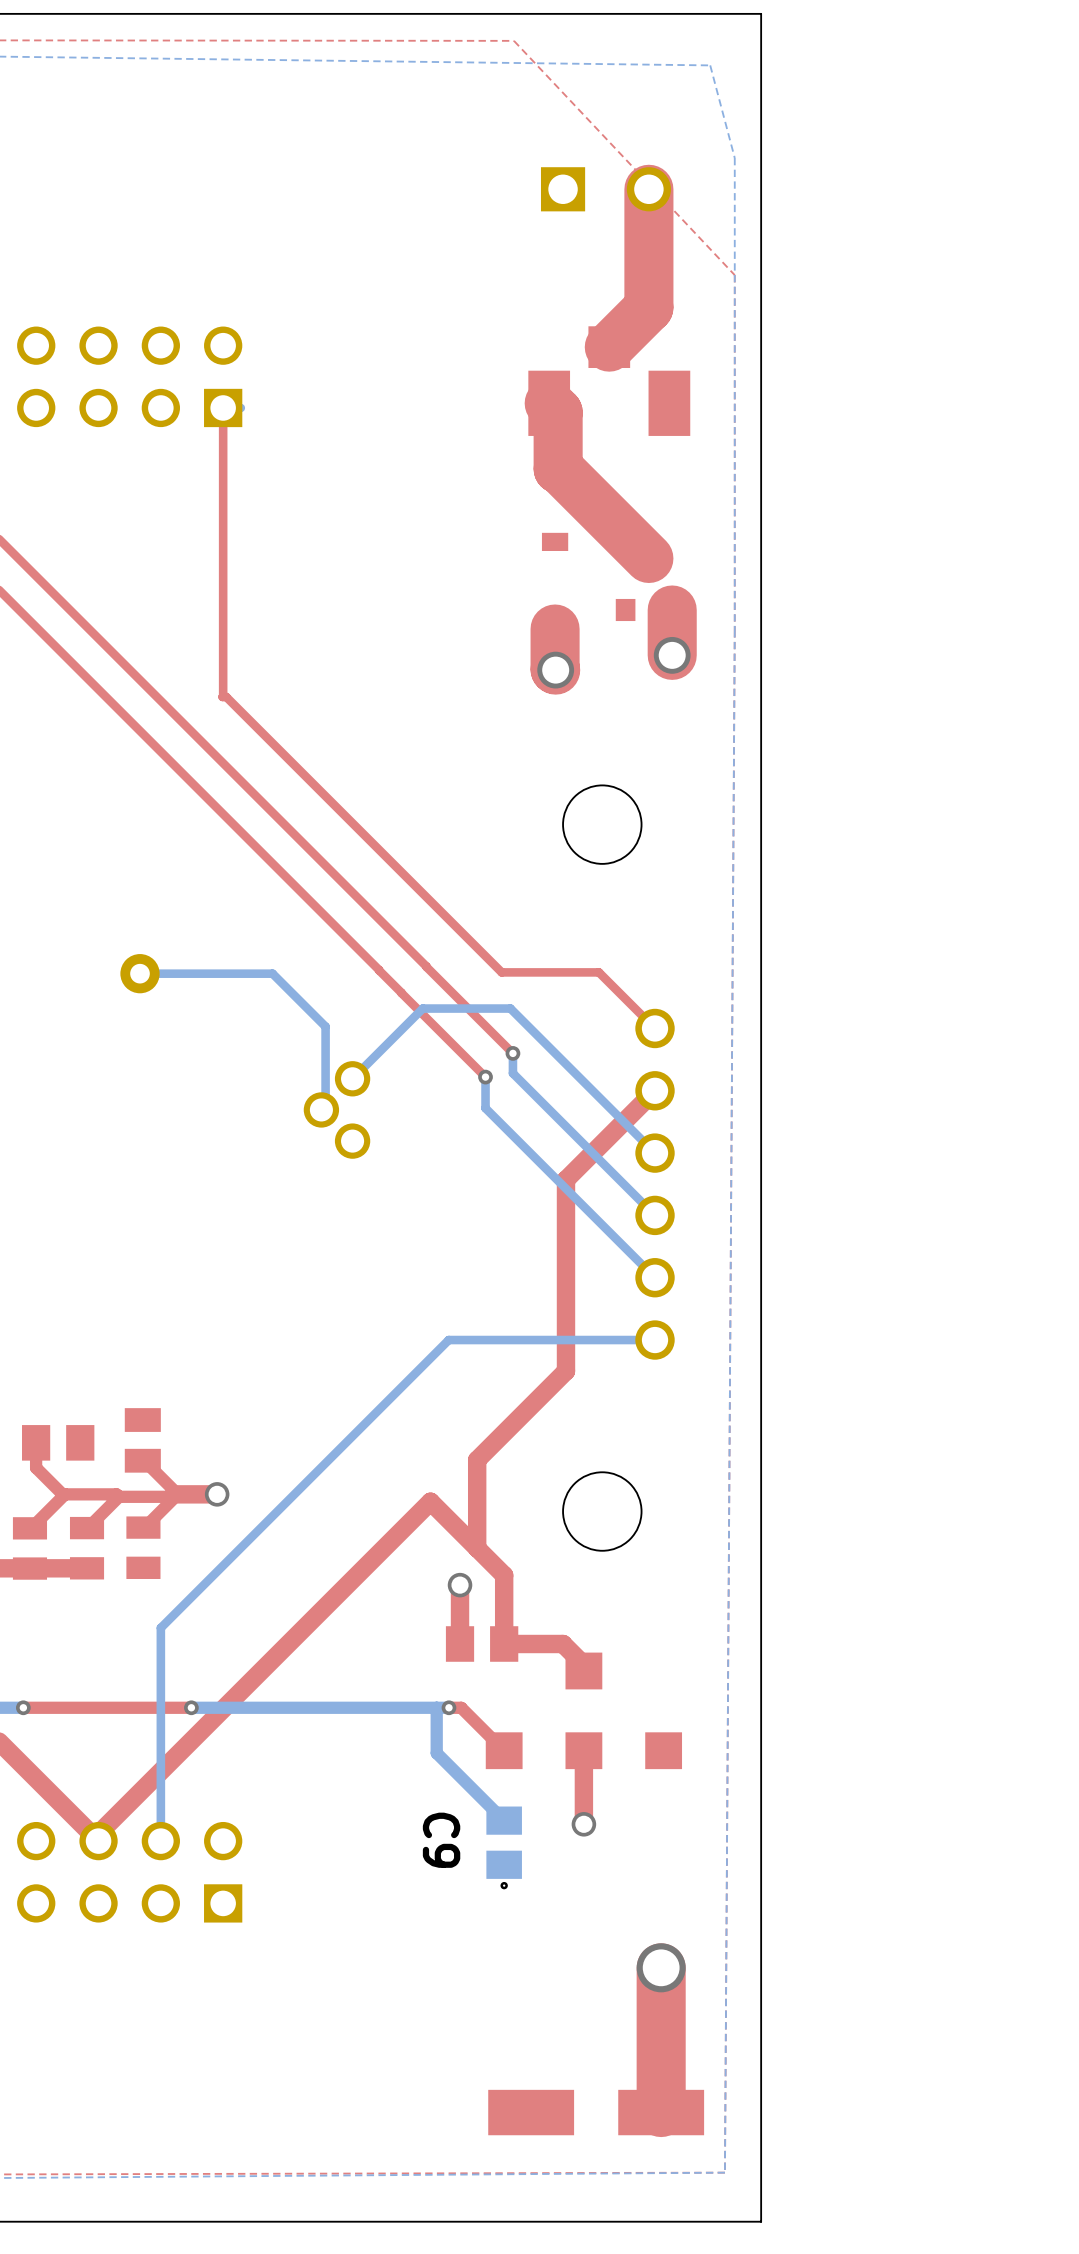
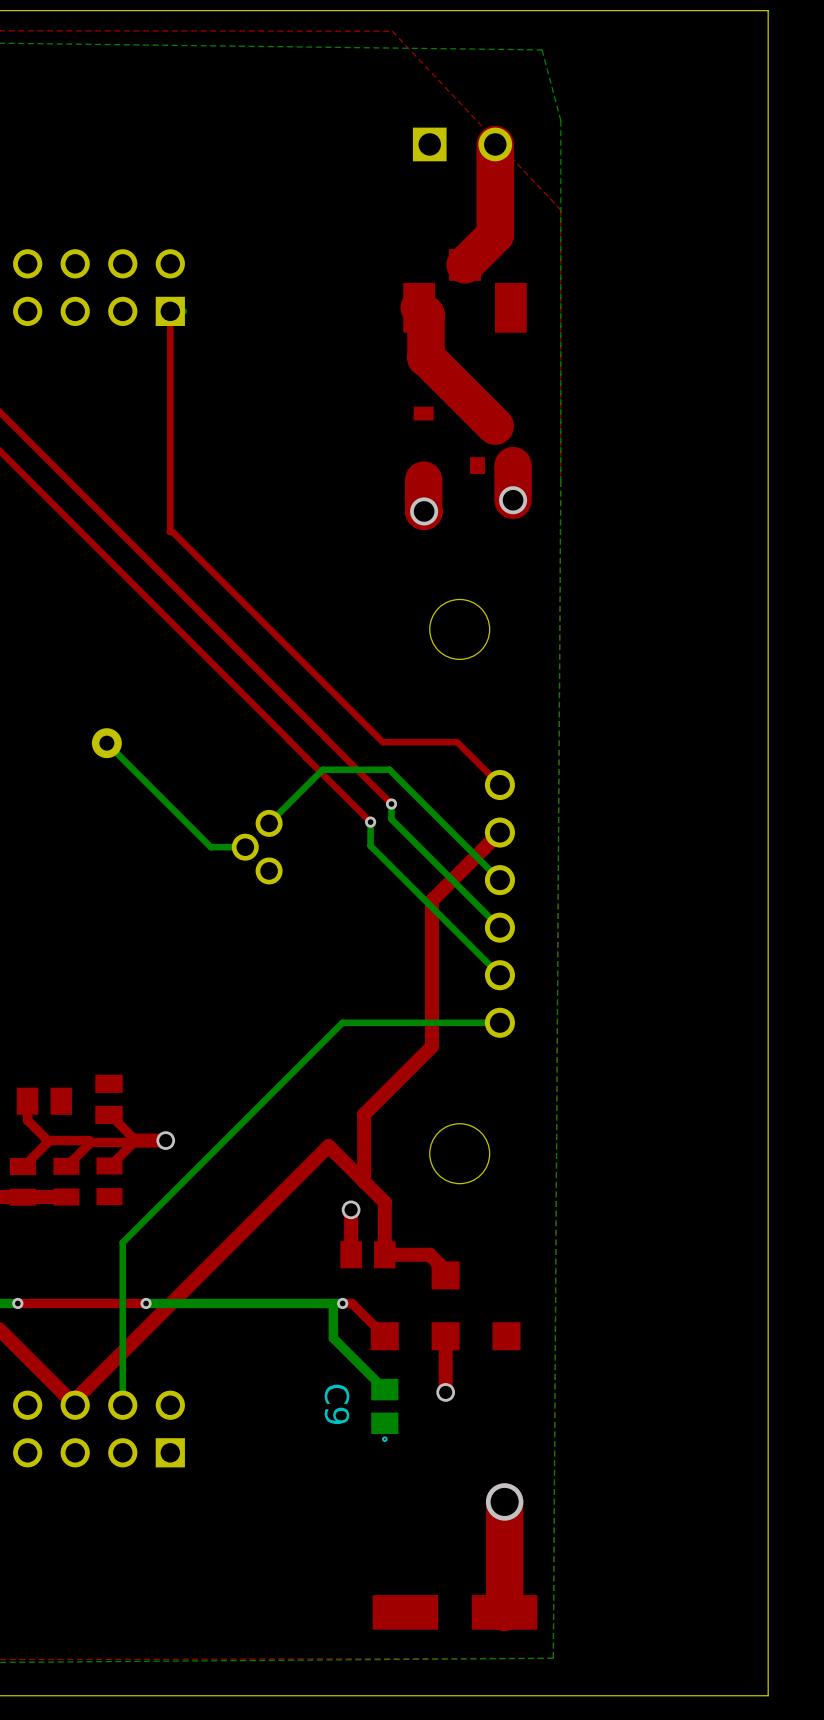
board edge: (761, 13) (761, 2221) -> (580, 10) (768, 10) (768, 1695) (580, 1695)
bottom track: (140, 973) (272, 973) (325, 1026) (325, 1105) -> (106, 743) (210, 847) (245, 847)

